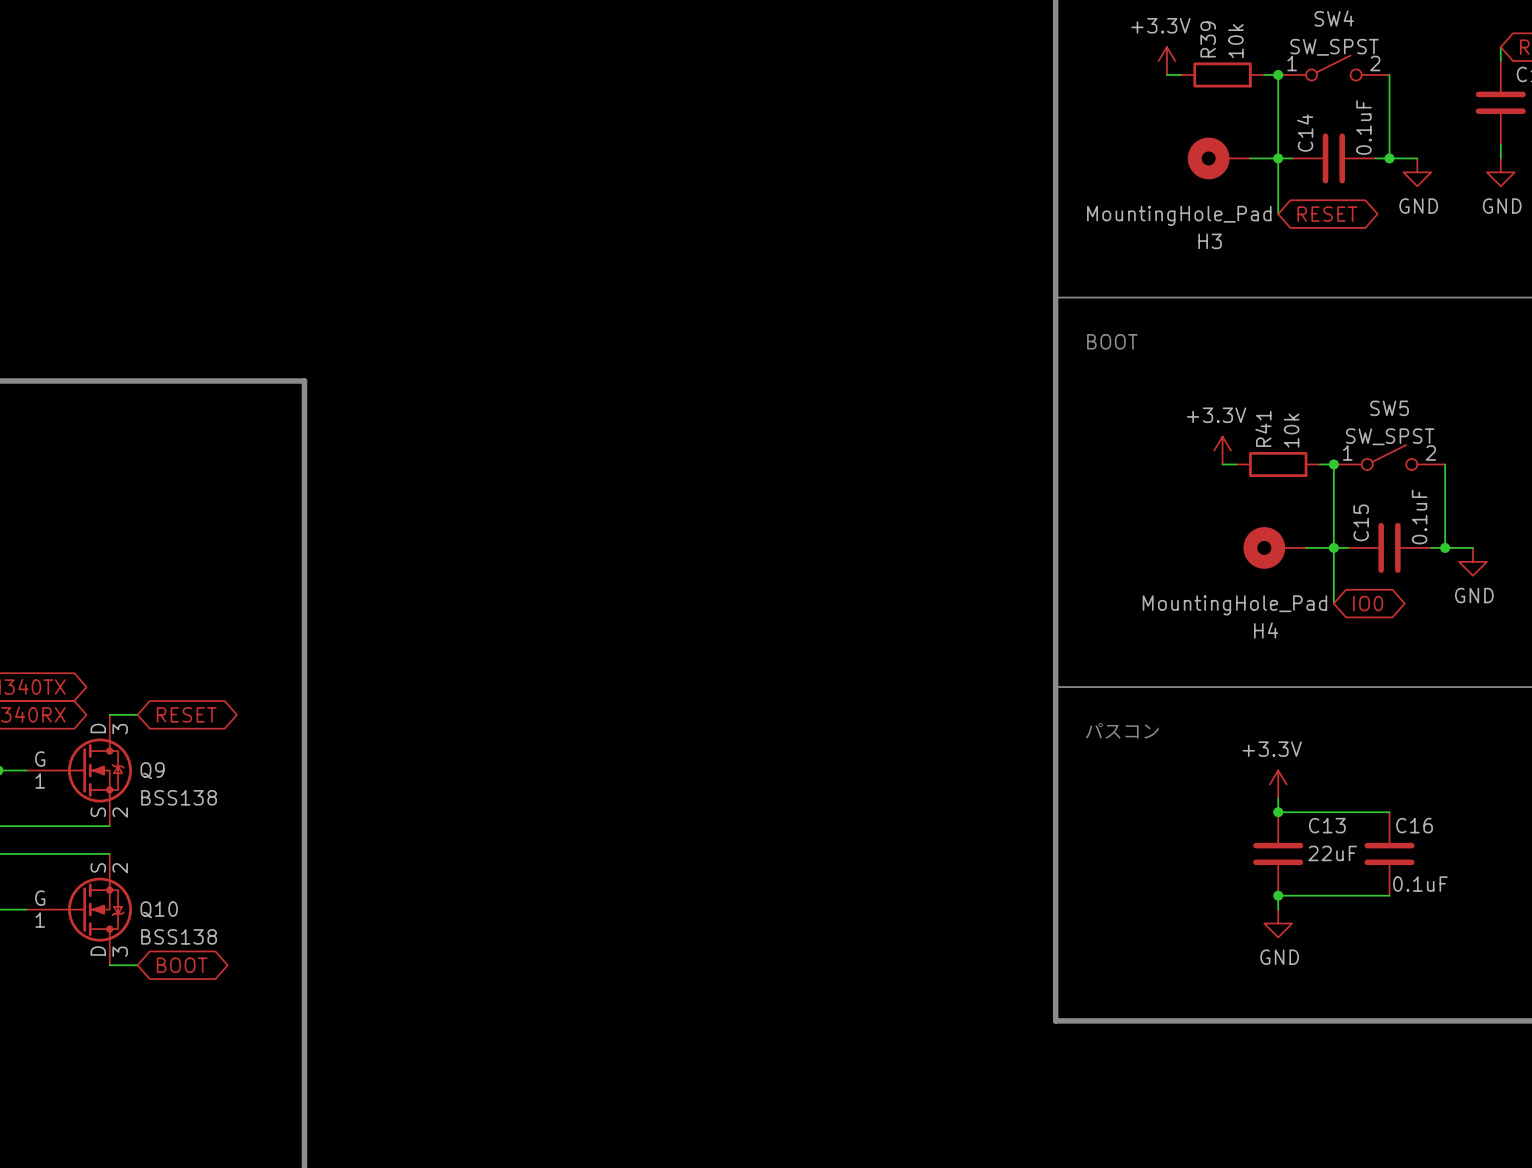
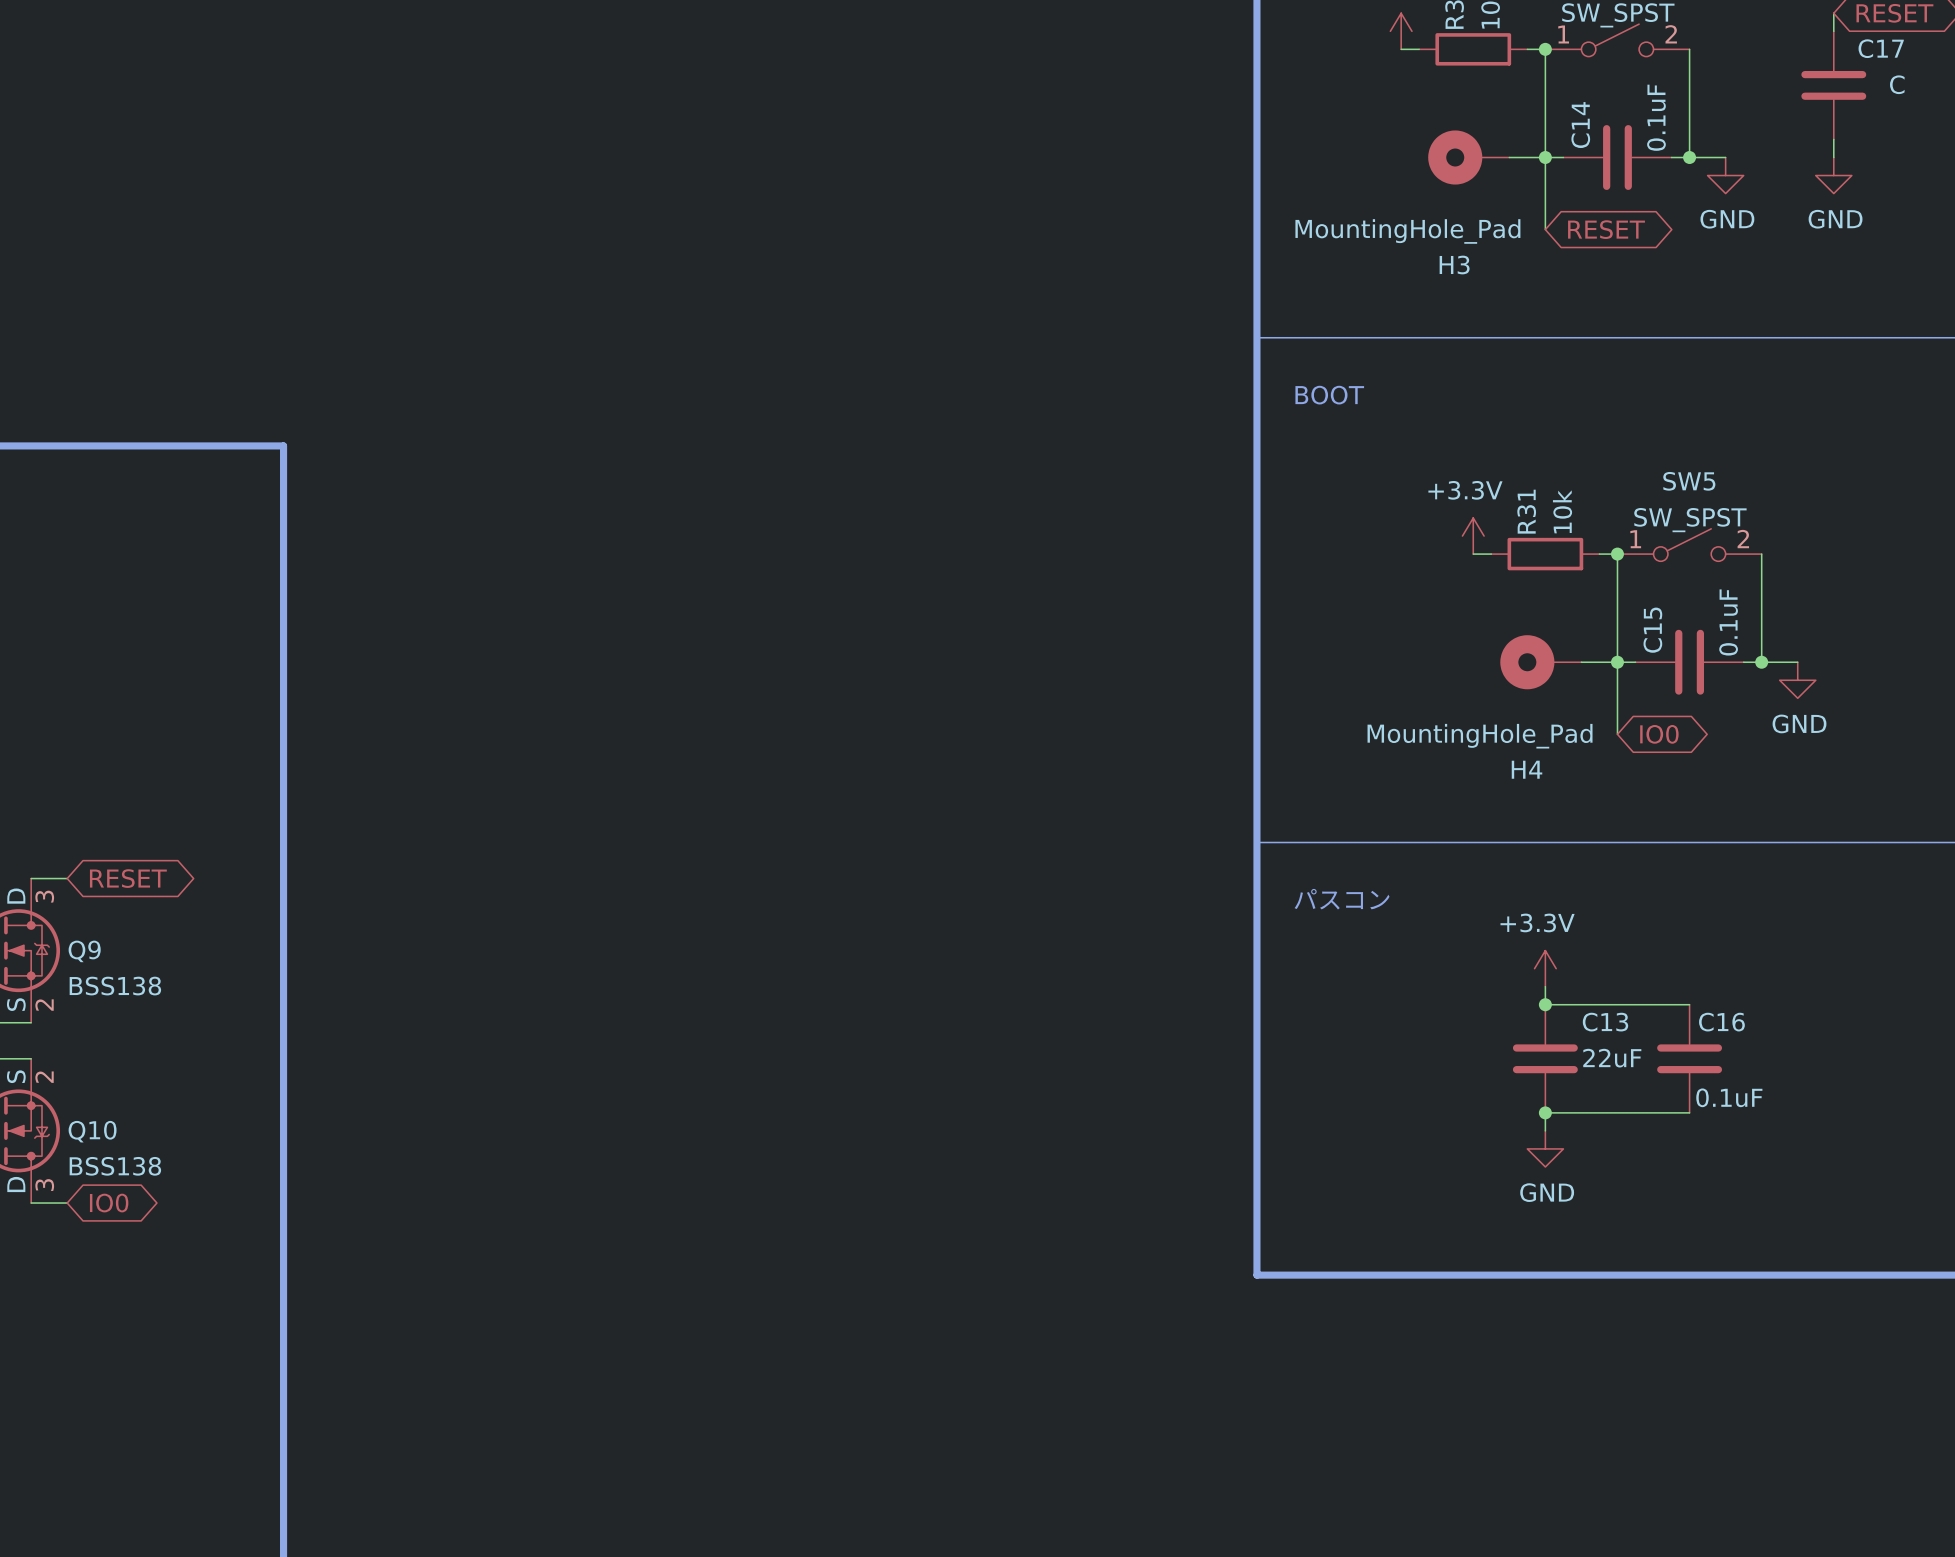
R41 name: R41 (1263, 428) -> R31 (1526, 511)
global label: BOOT (182, 965) -> IO0 (109, 1203)

